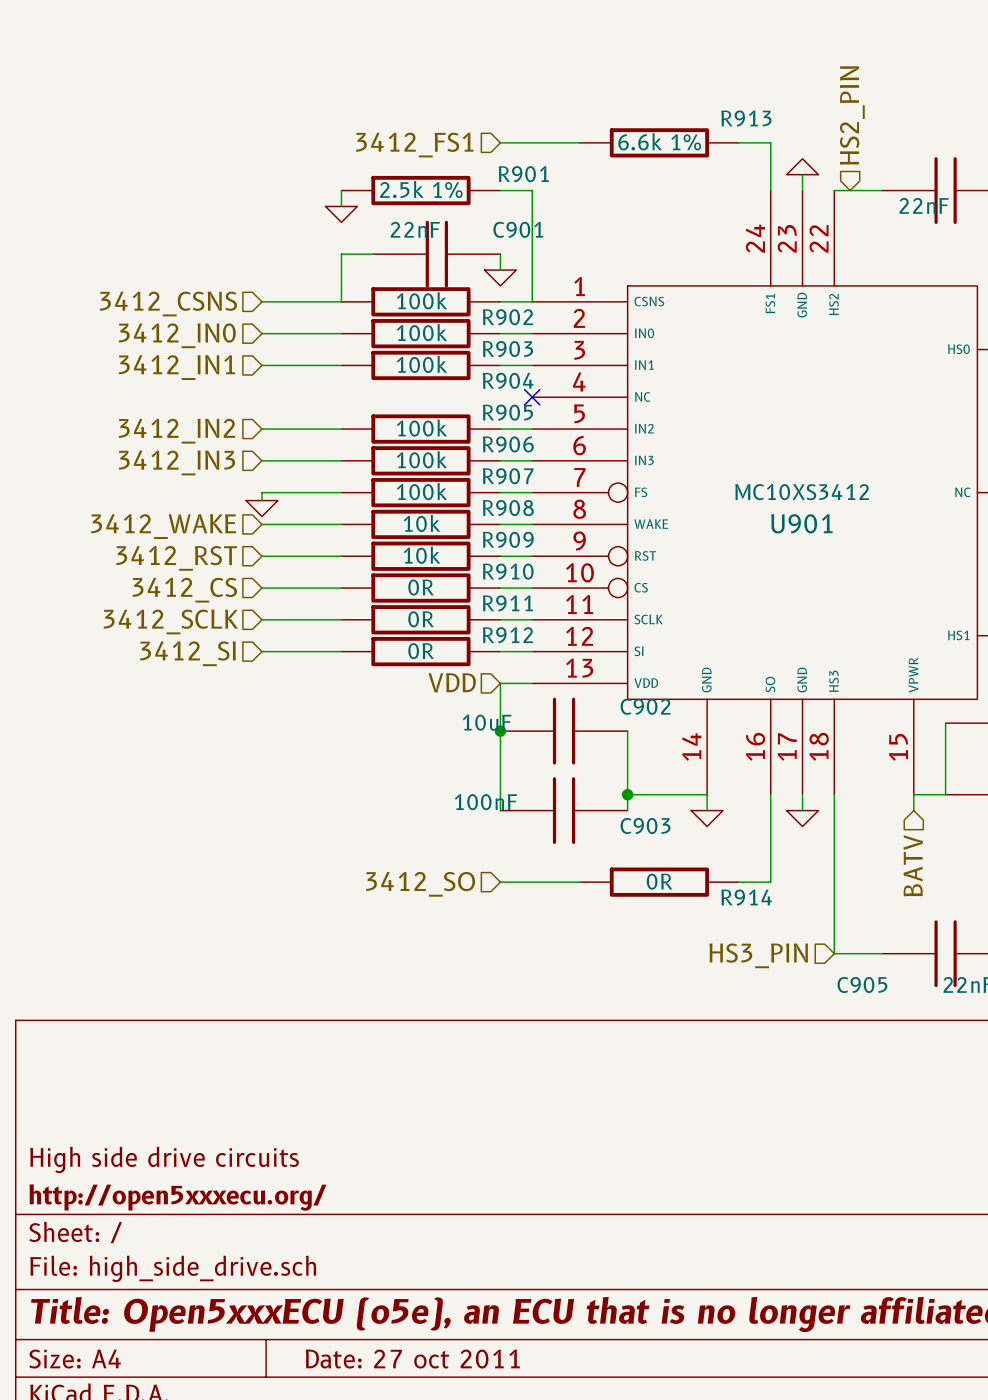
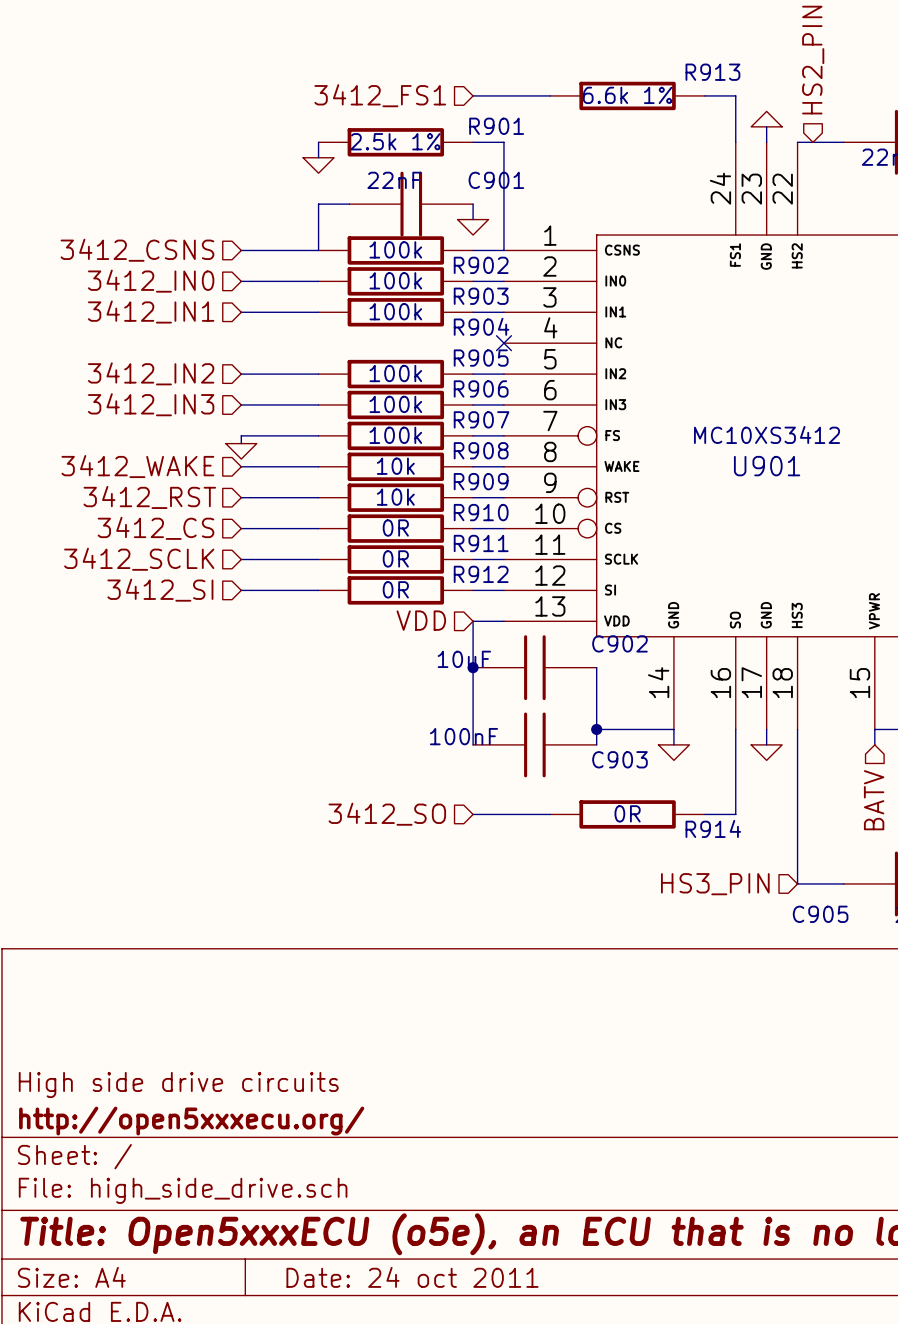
title block: Date: 27 oct 2011 (412, 1359) -> Date: 24 oct 2011 (412, 1277)

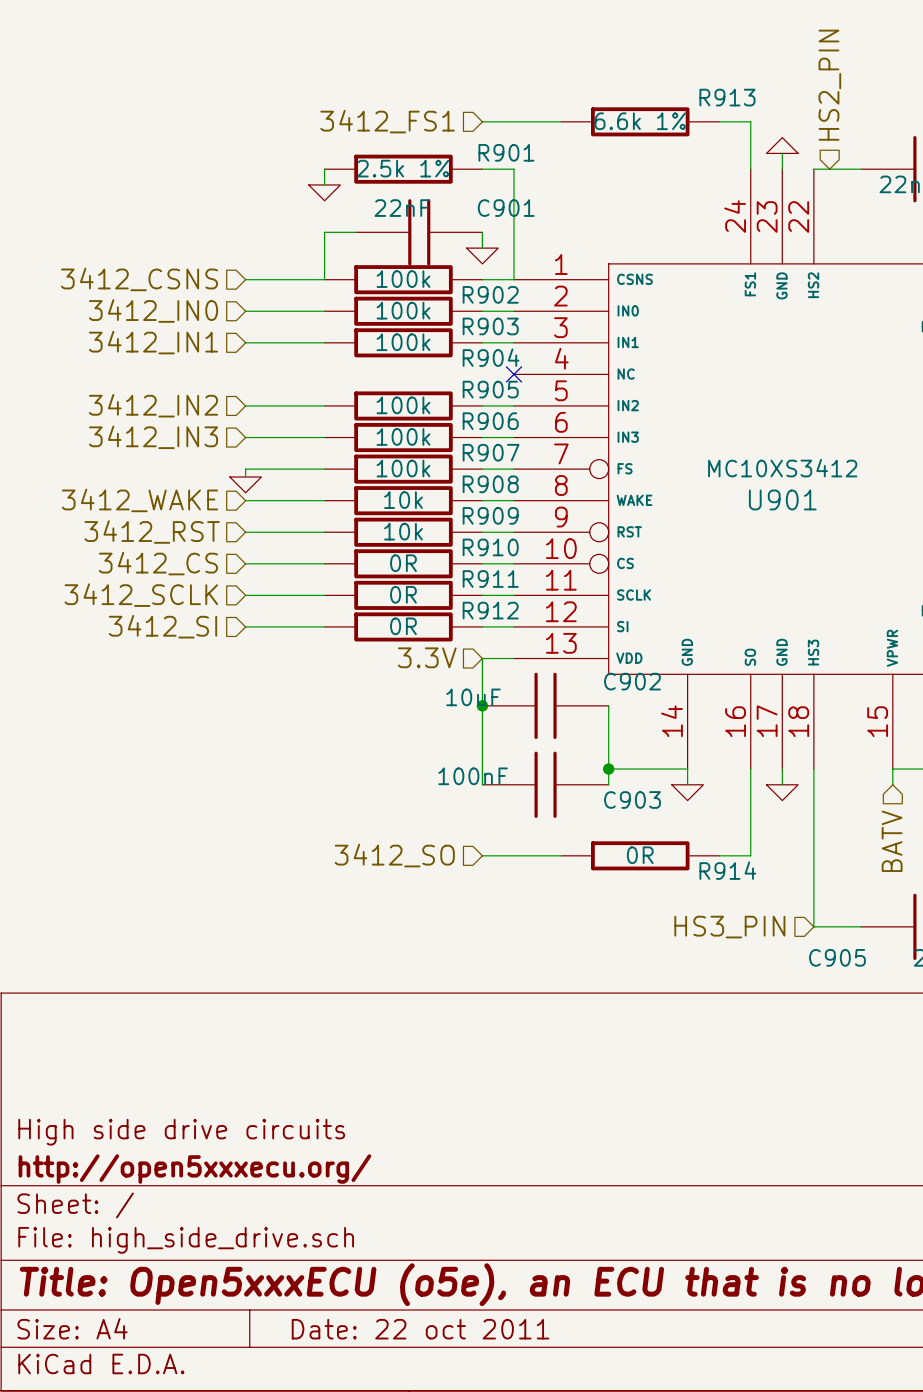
hierarchical label: VDD (421, 620) -> 3.3V (427, 657)
title block: Date: 24 oct 2011 (412, 1277) -> Date: 22 oct 2011 (420, 1329)

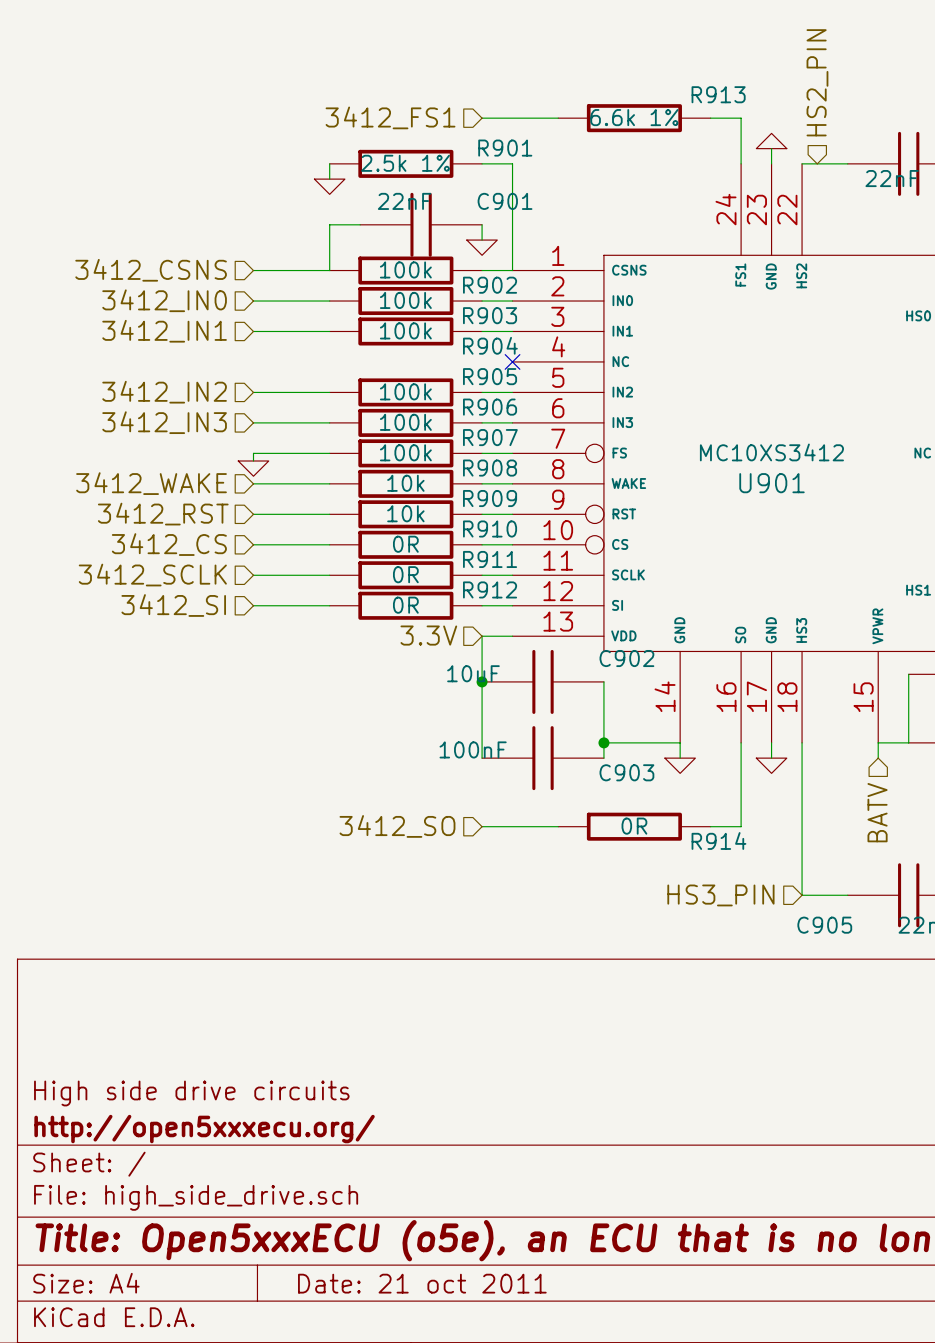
title block: Date: 22 oct 2011 (420, 1329) -> Date: 21 oct 2011 (422, 1283)

